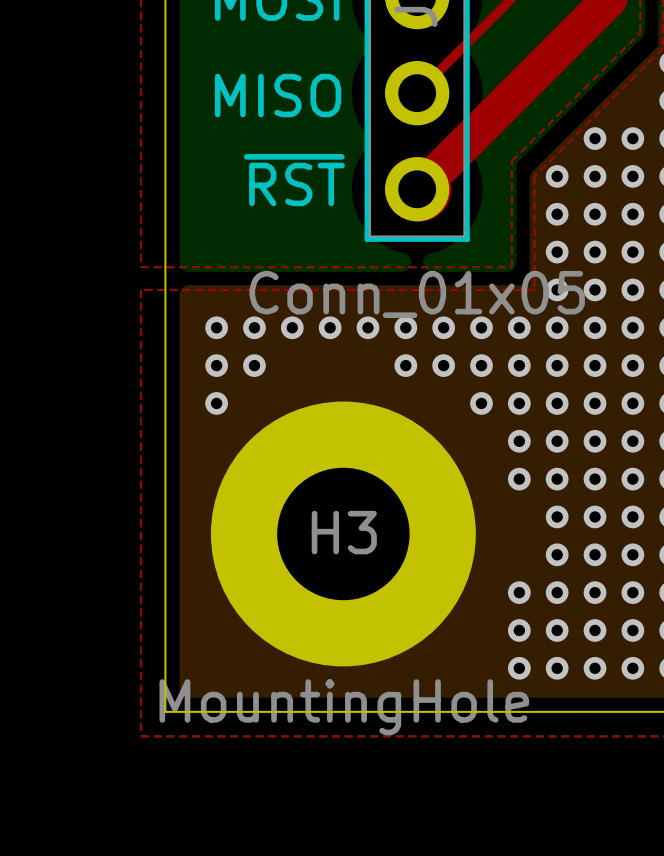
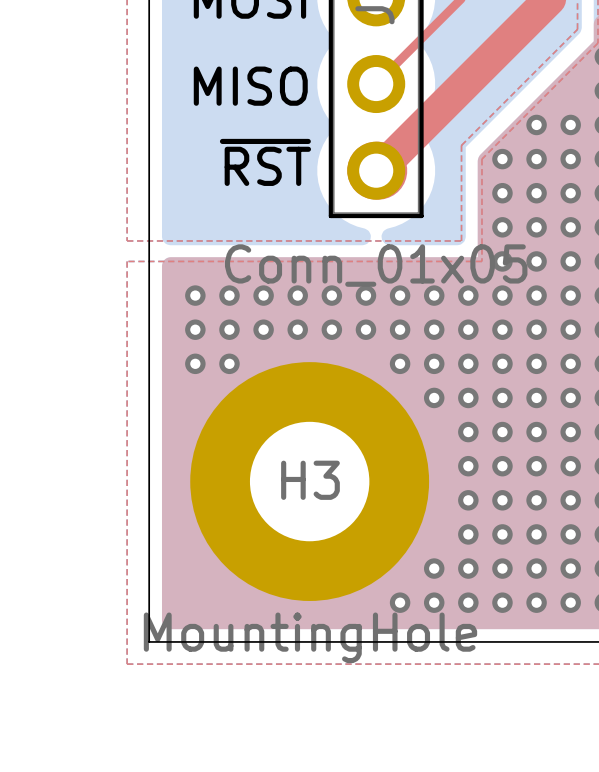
via: none -> (263, 329)
via: none -> (297, 329)
via: none -> (331, 329)
via: none -> (229, 363)
via: none -> (400, 363)
via: none -> (434, 397)
via: none -> (468, 466)
via: none -> (468, 500)
via: none -> (434, 568)
via: none -> (400, 602)
via: none -> (434, 602)

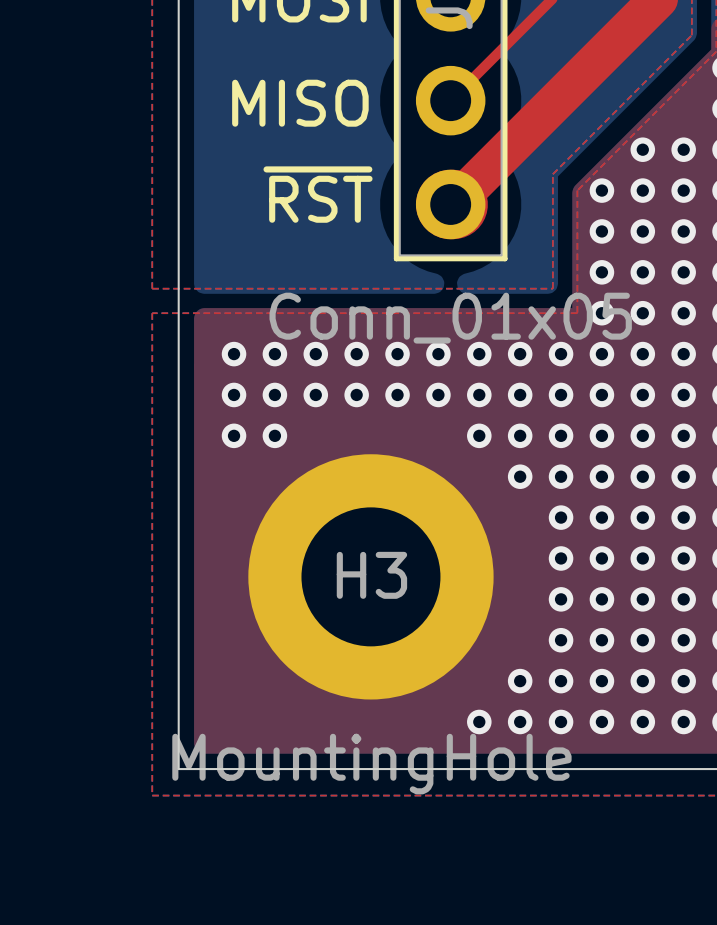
H3 footprint: [190, 362, 430, 601] -> [248, 454, 494, 700]

